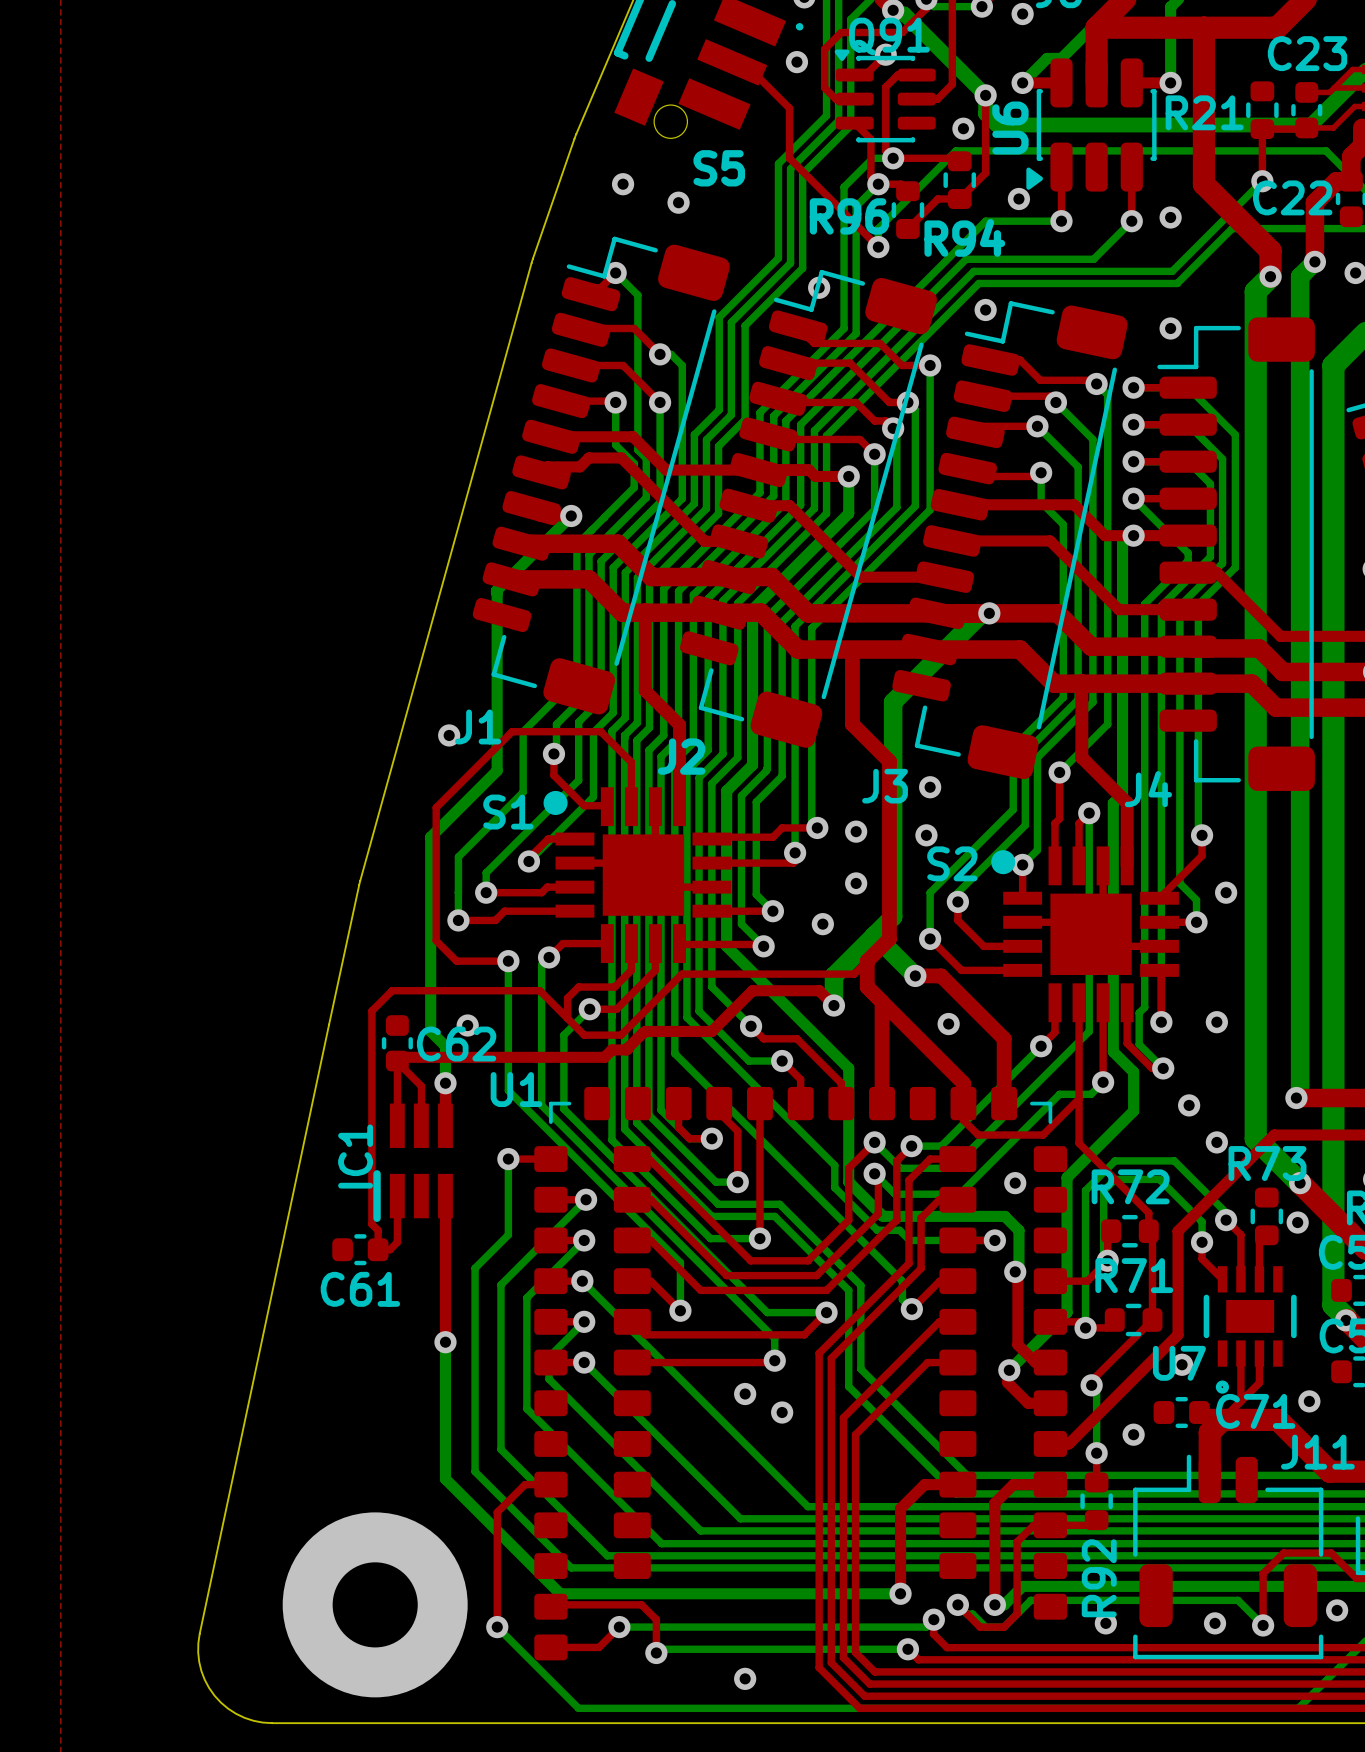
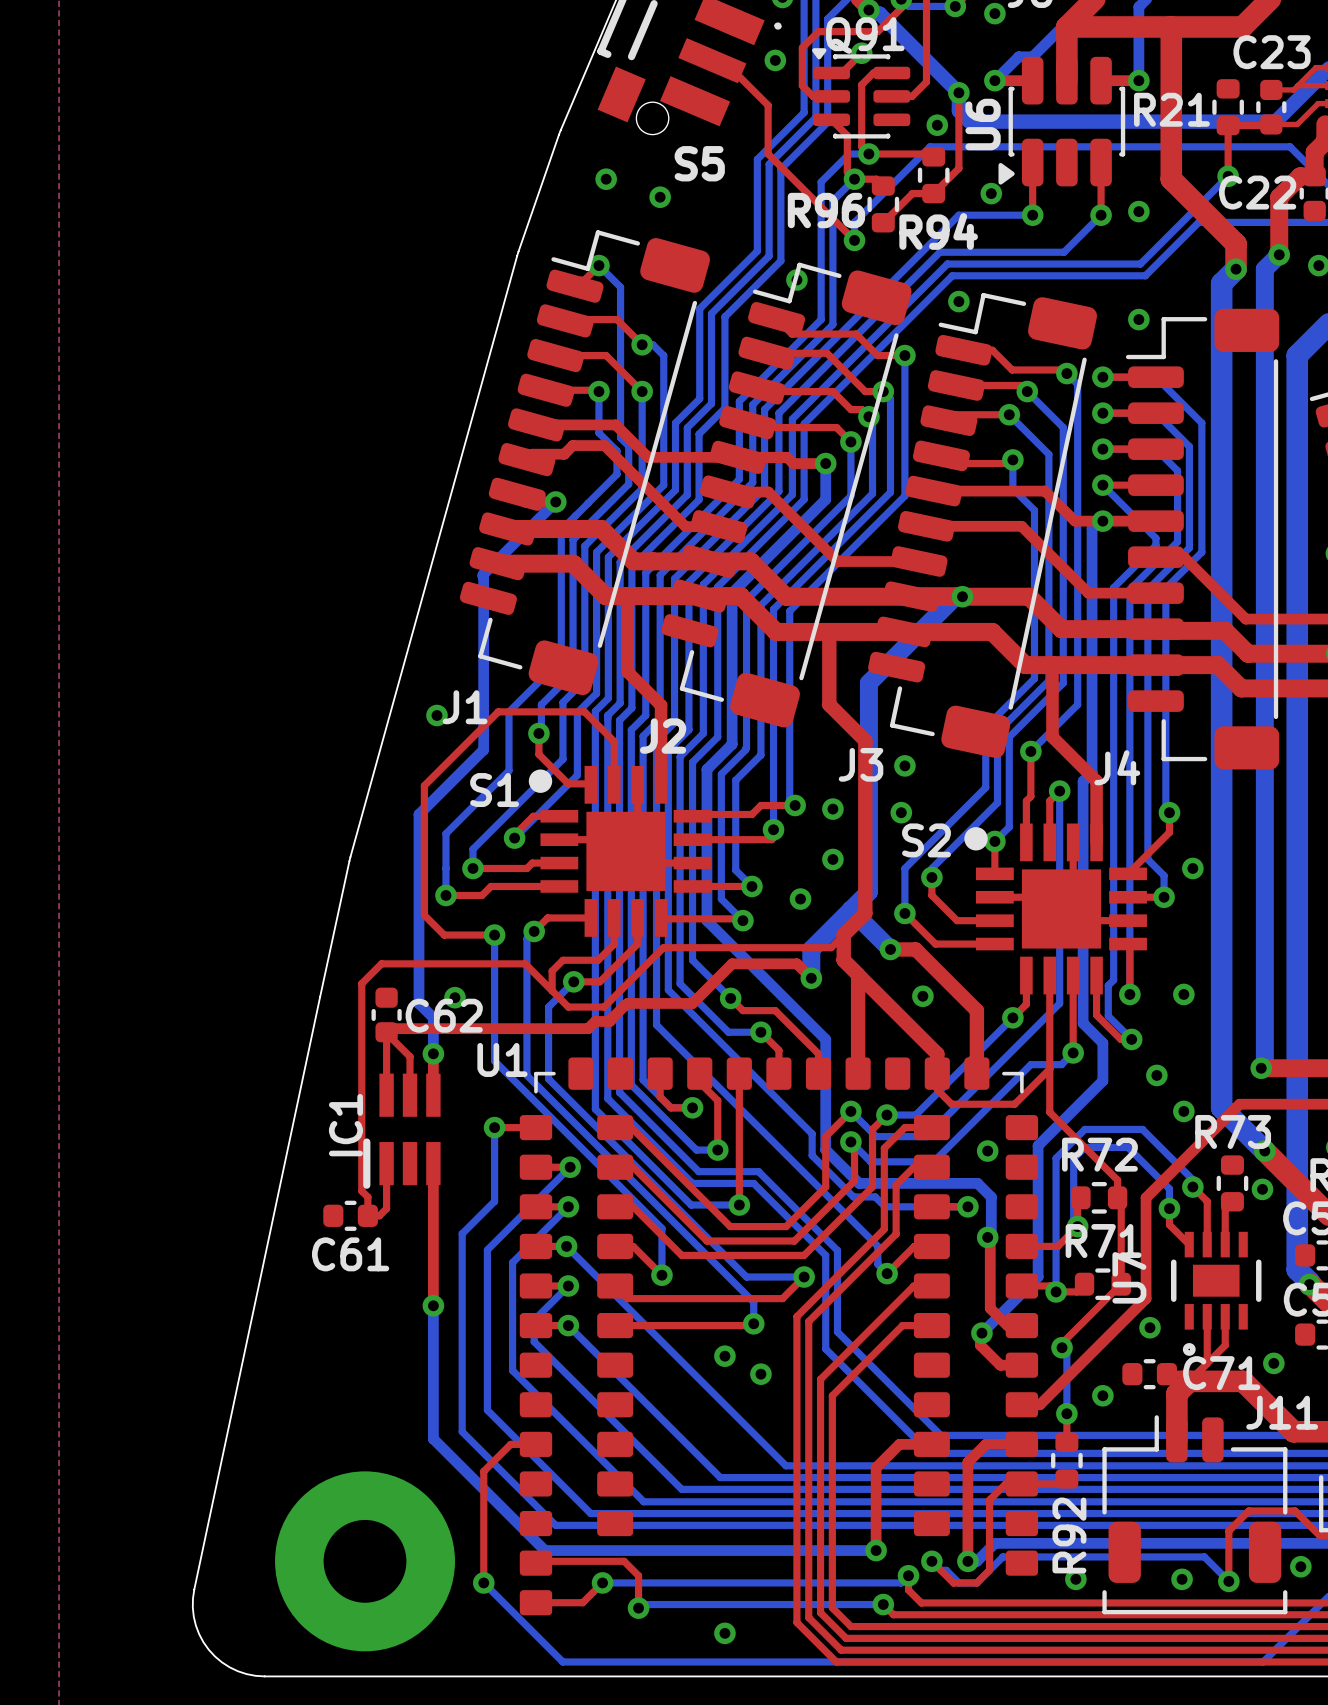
U7 name rotation: 0° (1179, 1363) -> 90° counterclockwise (1129, 1277)

